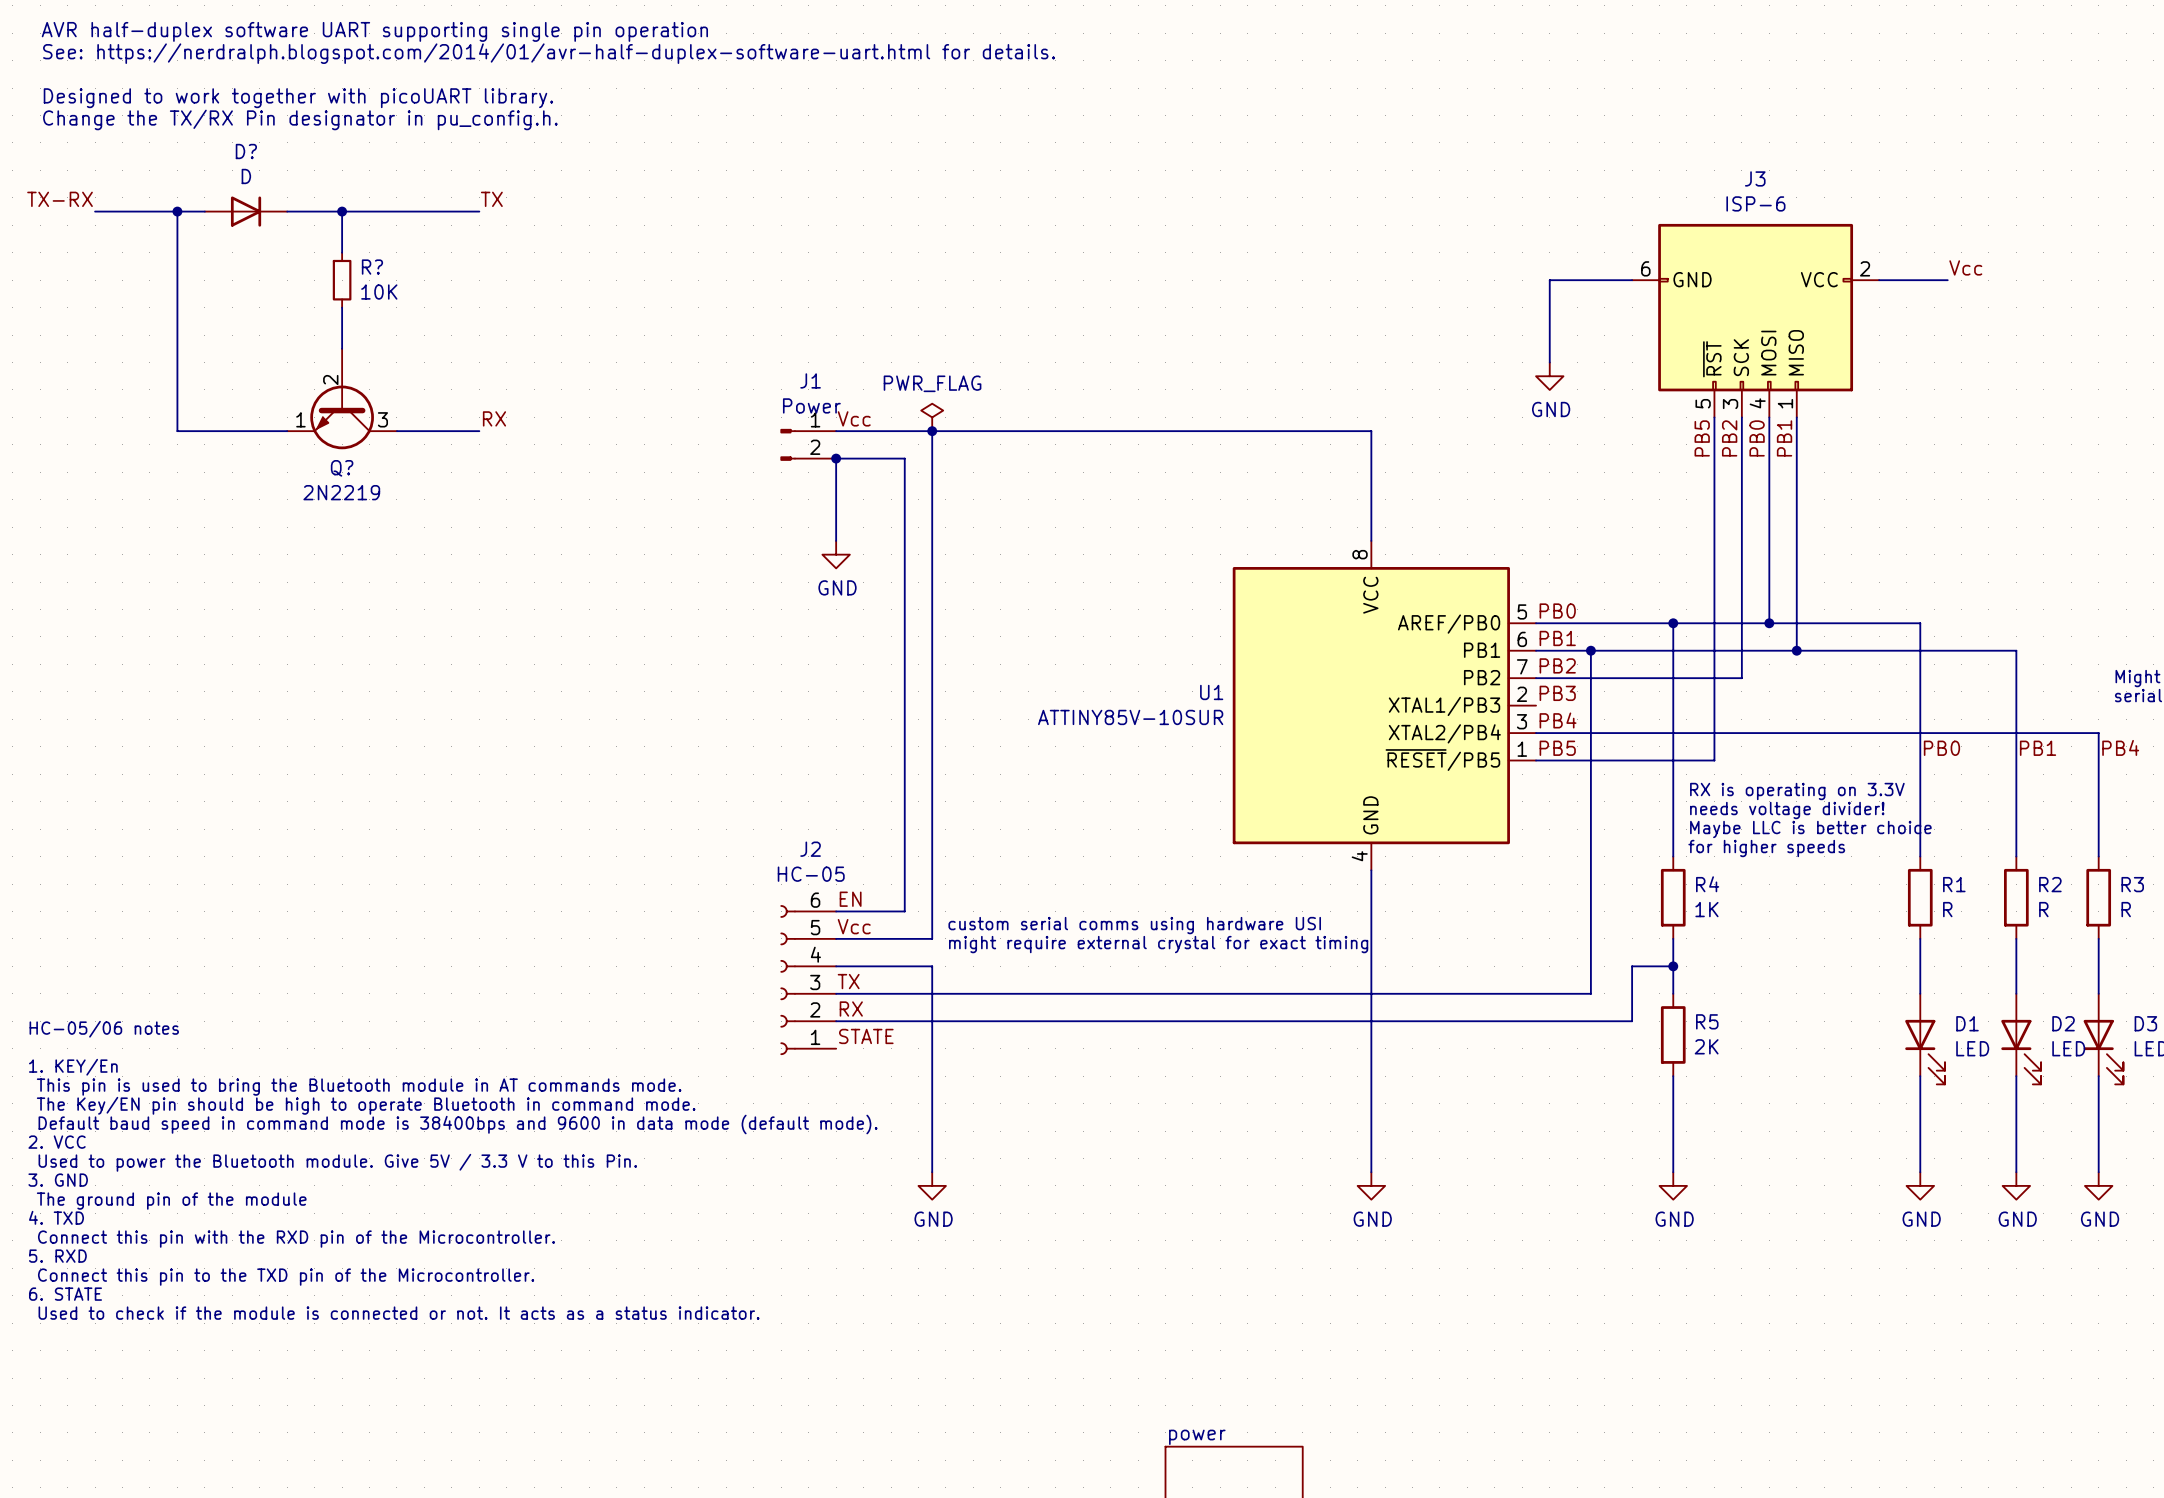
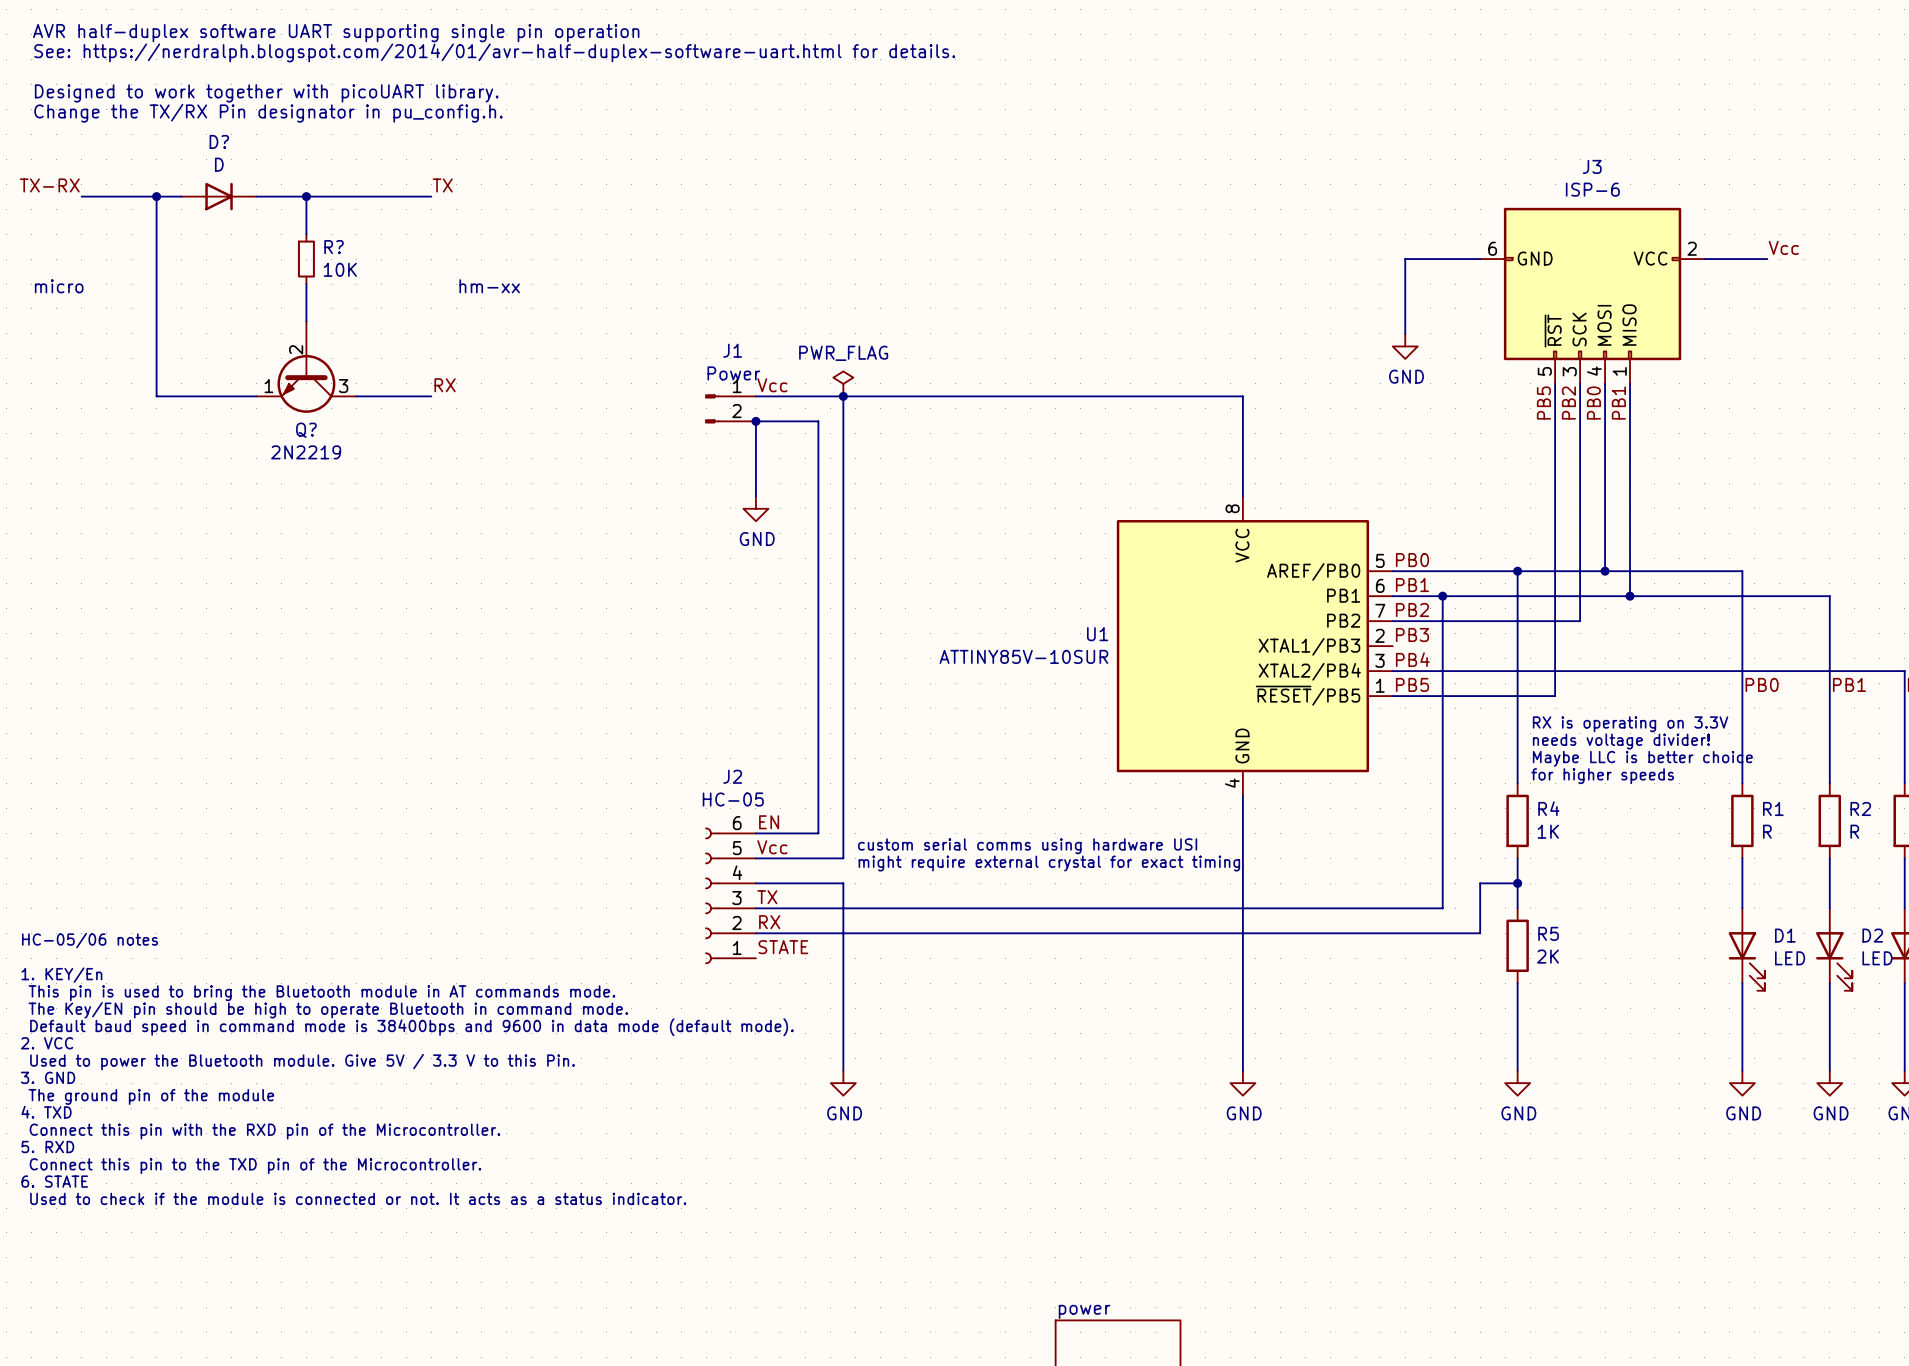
text: none -> micro (59, 286)
text: none -> hm-xx (489, 286)

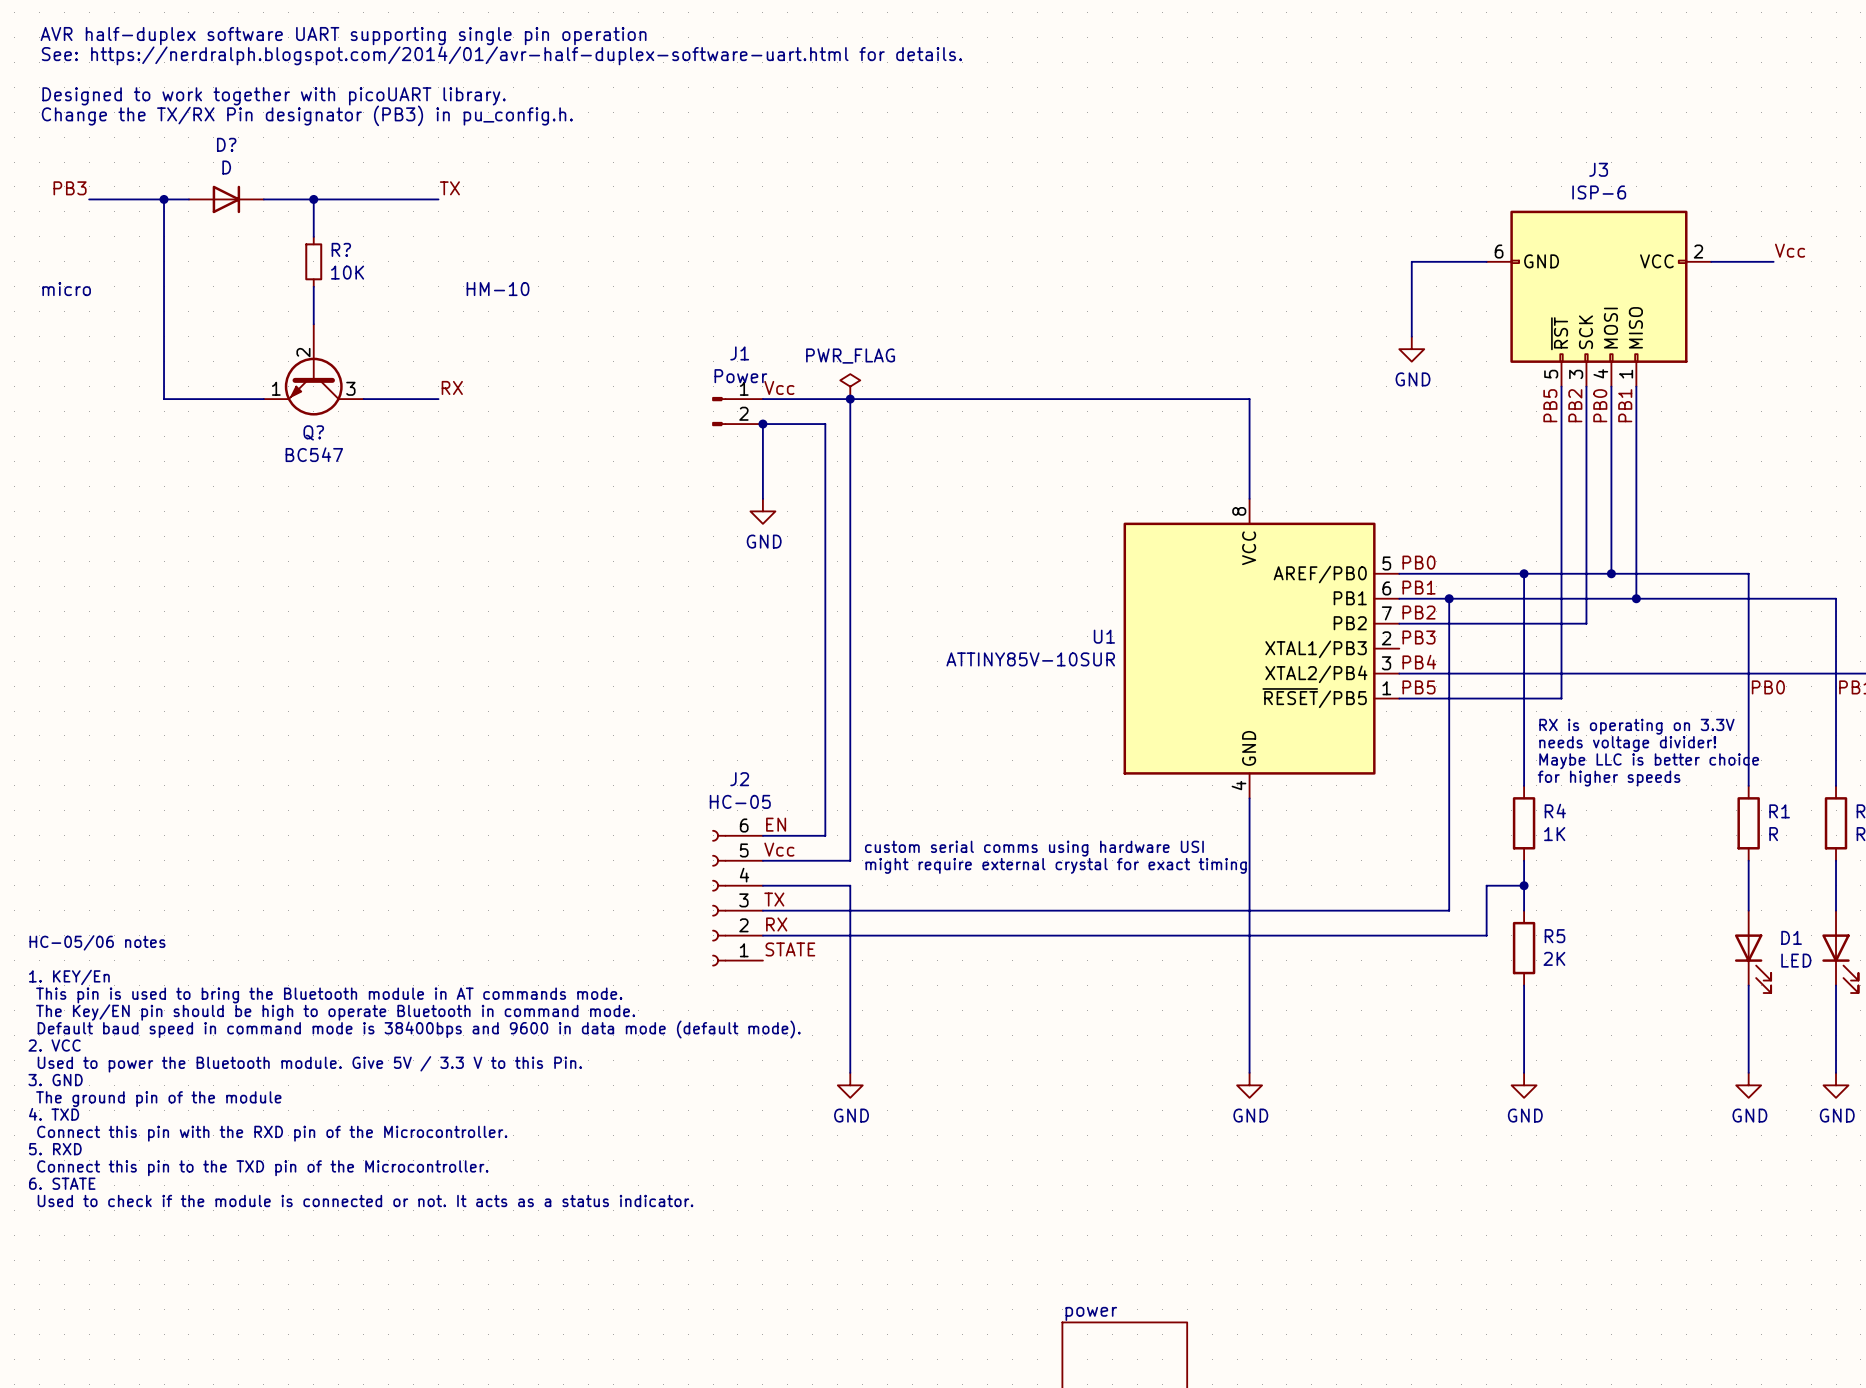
text: Change the TX/RX Pin designator in pu_config.h. (268, 113) -> Change the TX/RX Pin designator (PB3) in pu_config.h. (307, 115)
label: TX-RX (49, 185) -> PB3 (70, 188)
text: hm-xx (489, 286) -> HM-10 (498, 289)
Q? value: 2N2219 (306, 452) -> BC547 (314, 454)

